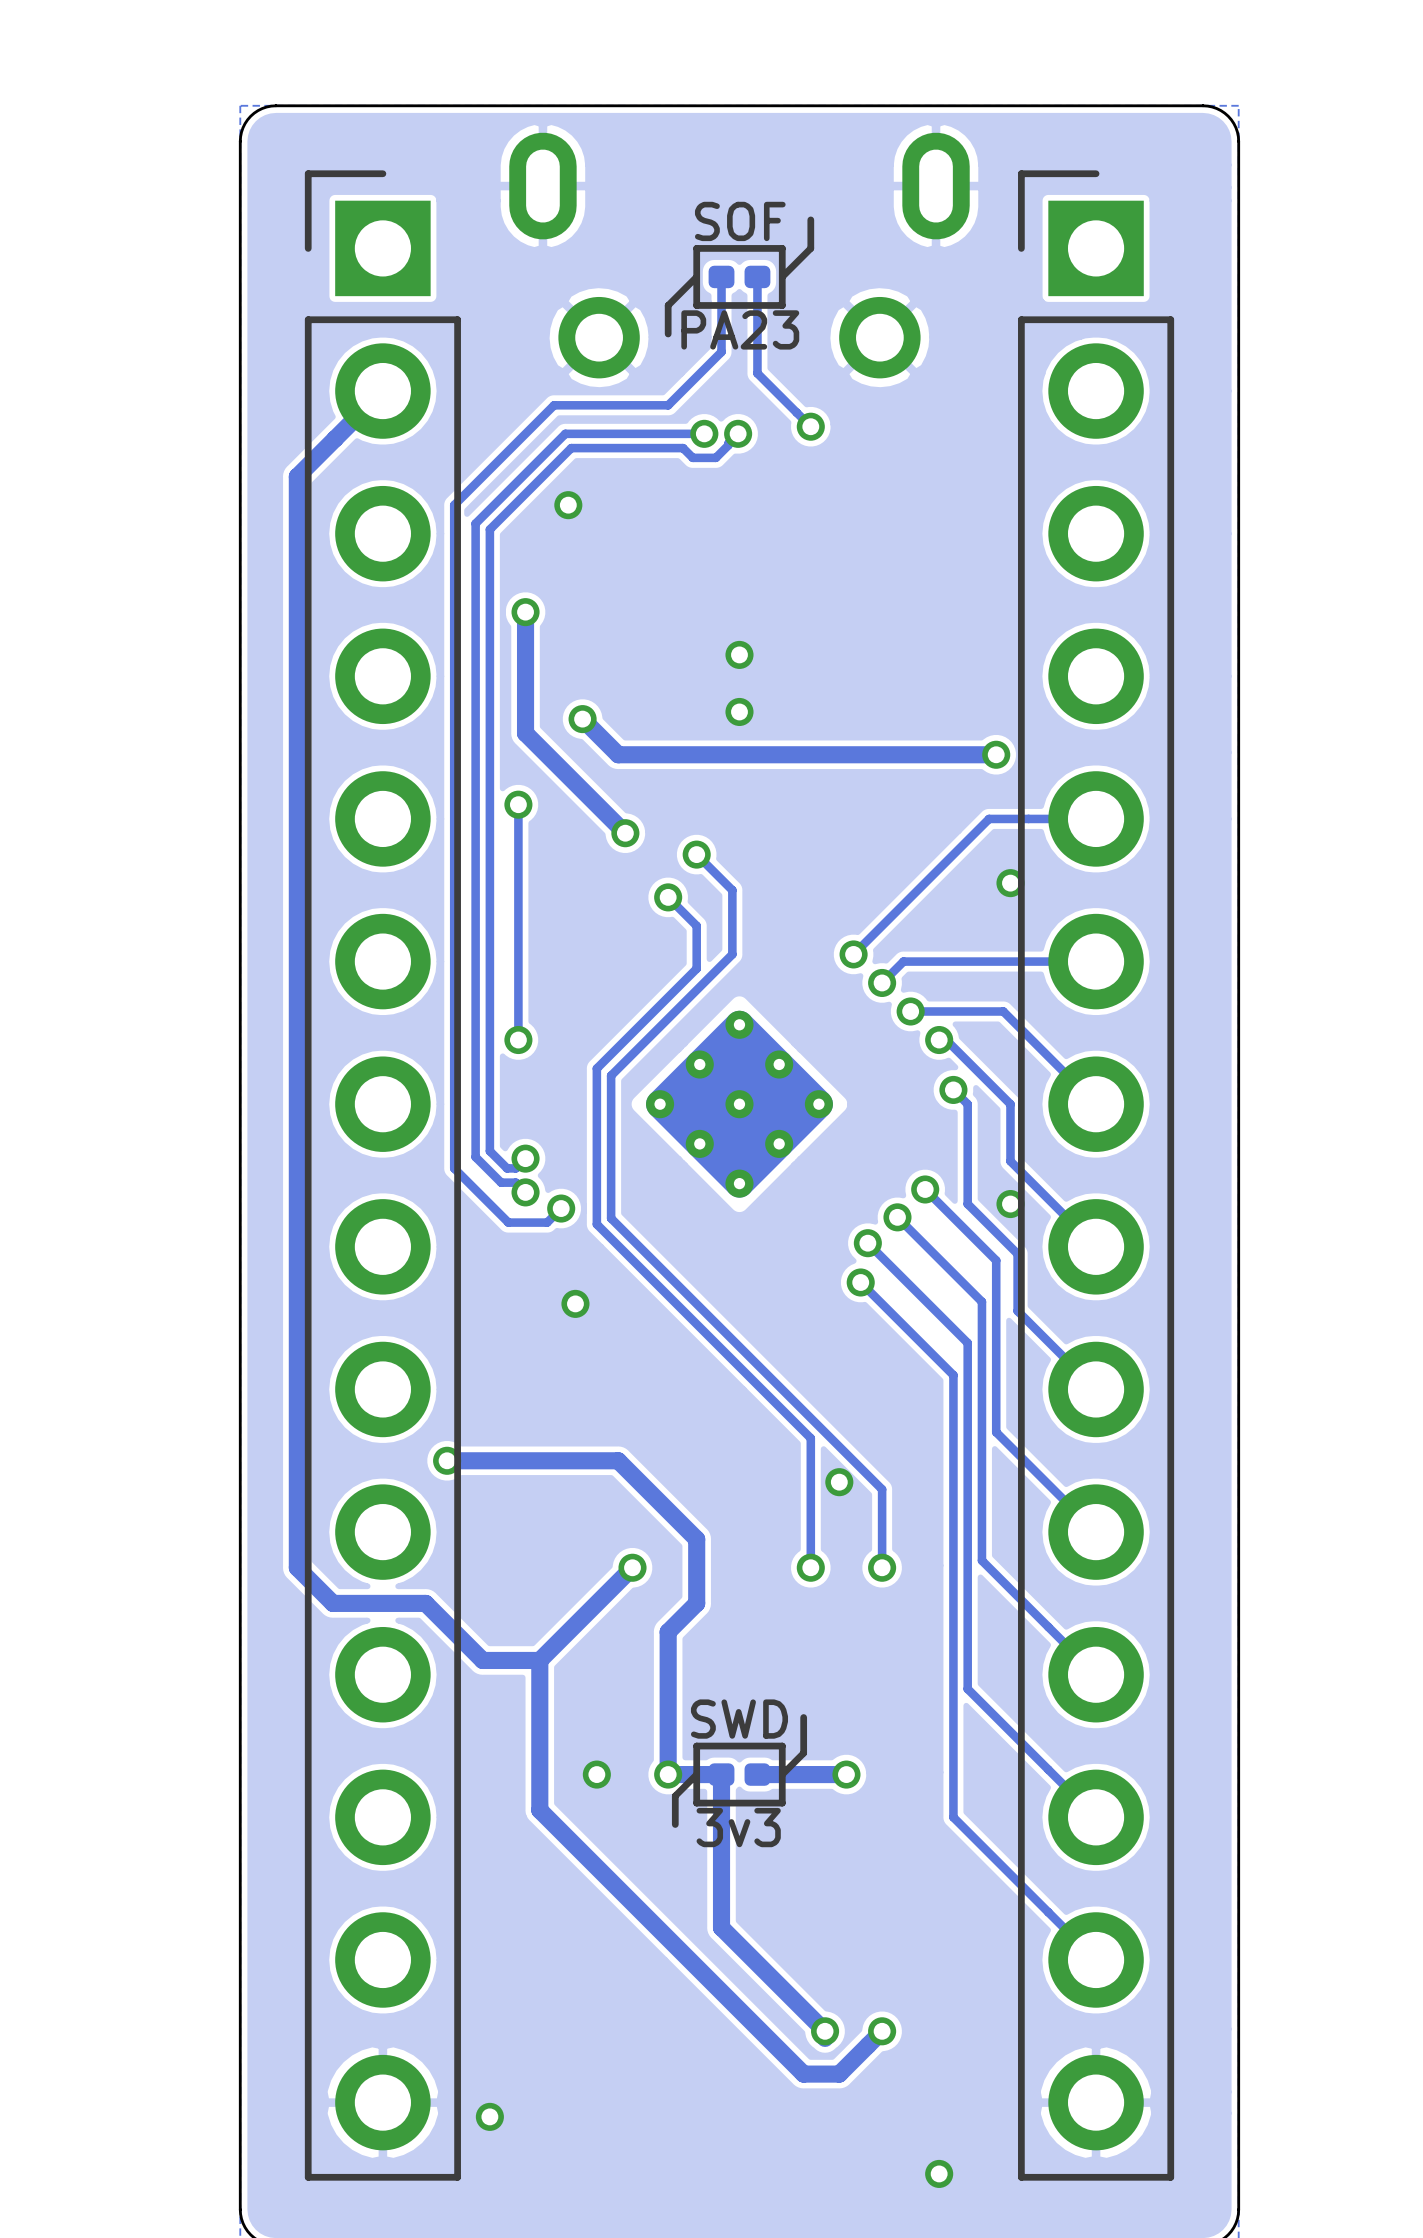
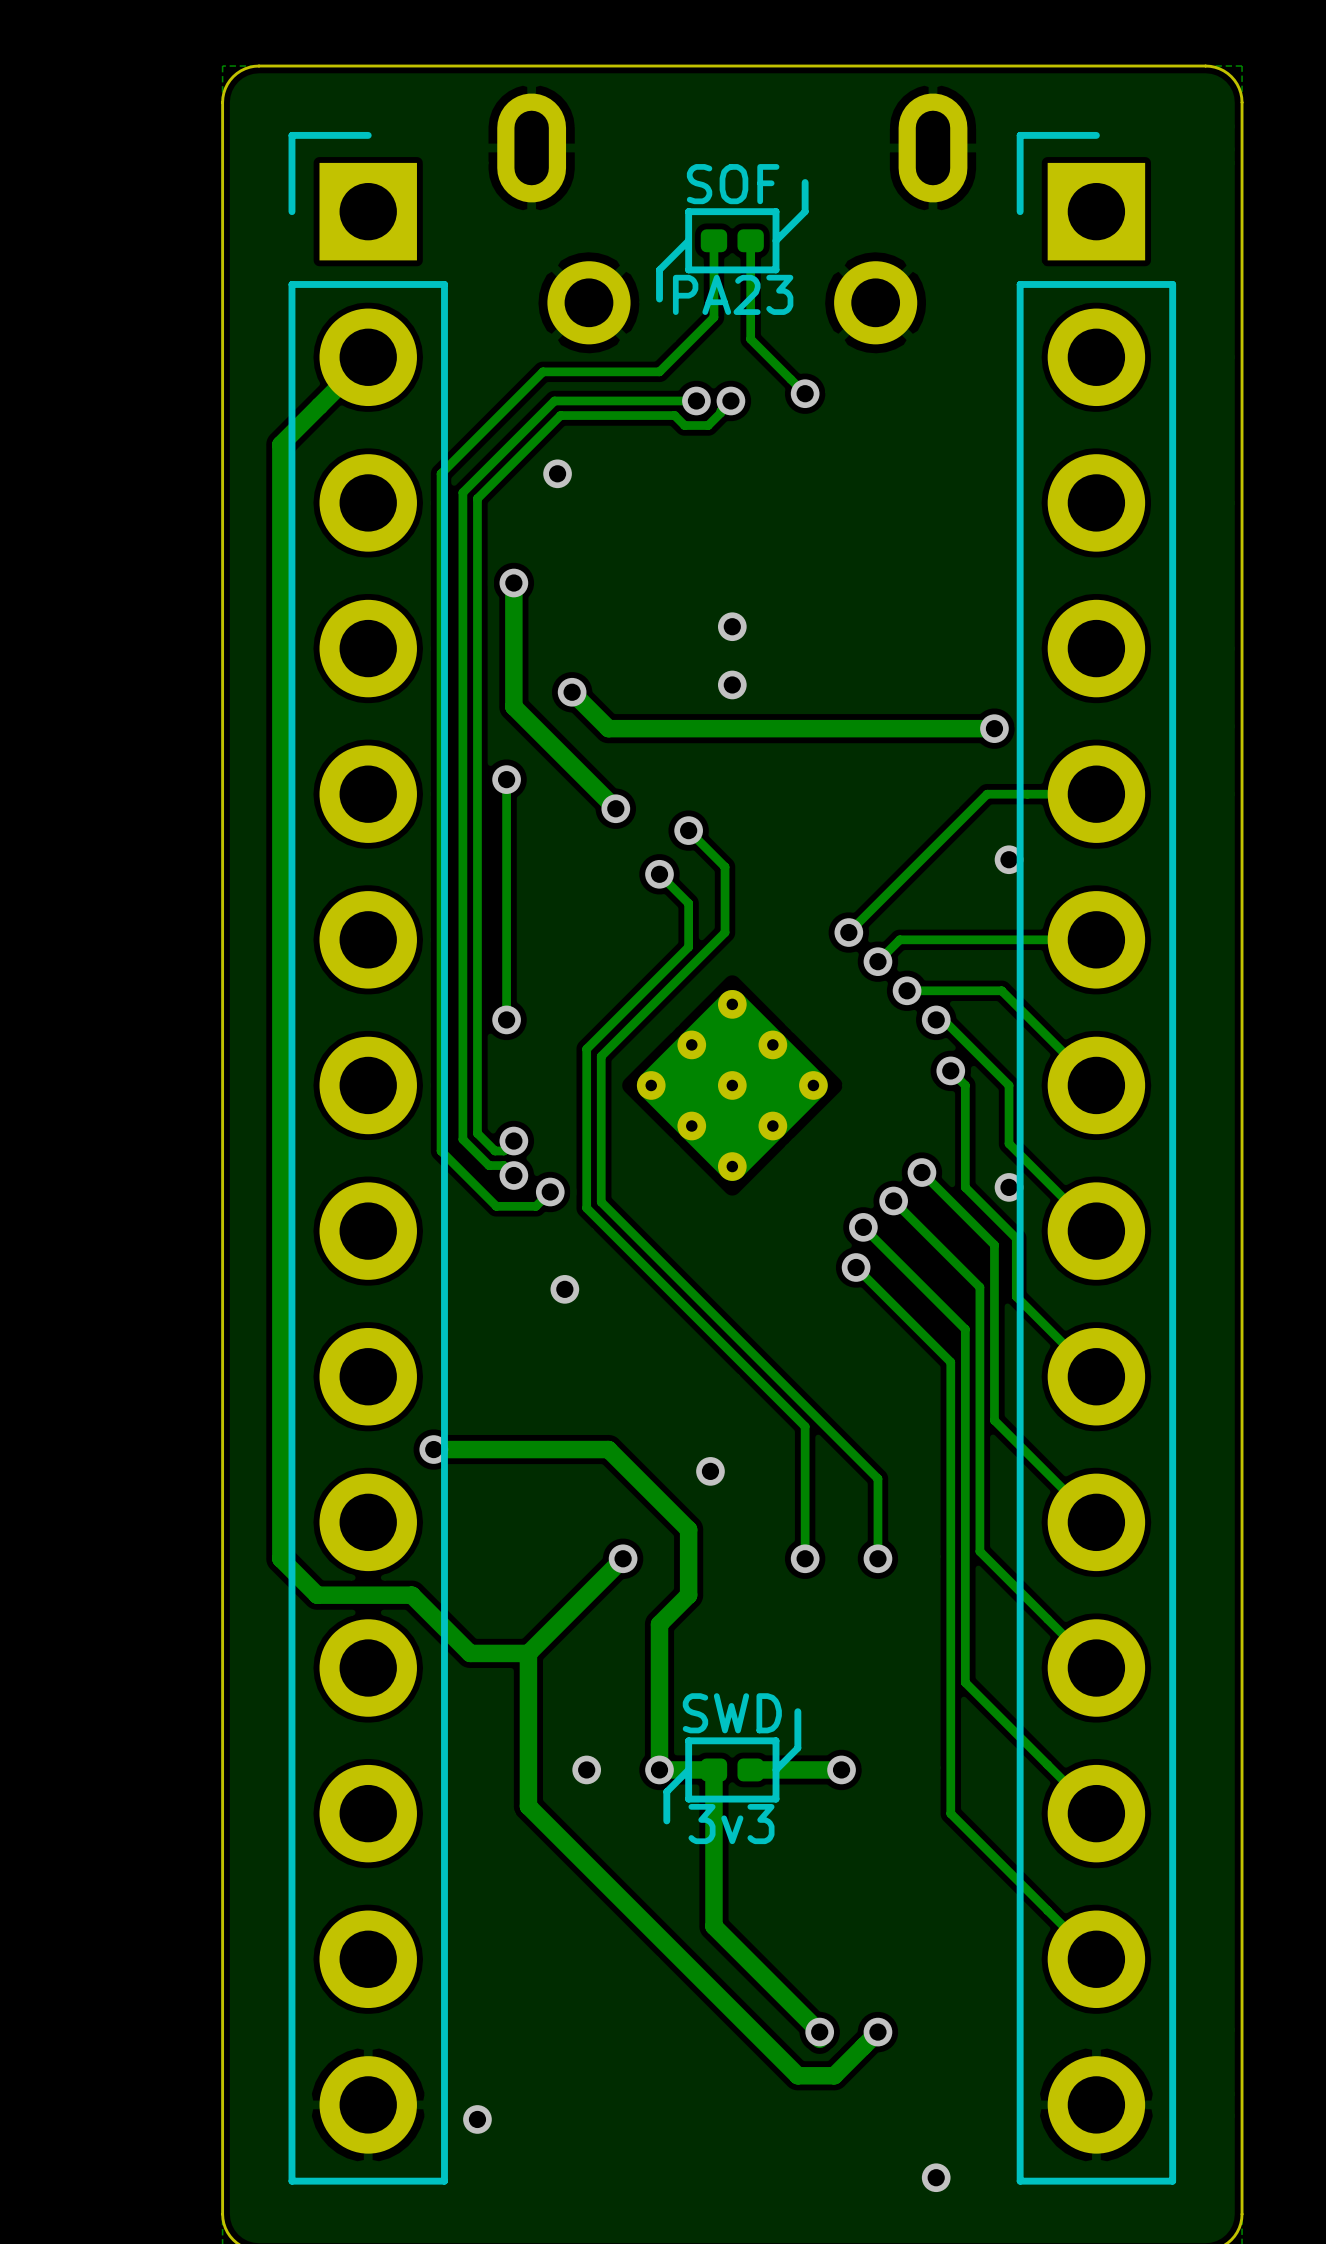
via position: (839, 1482) -> (710, 1471)

